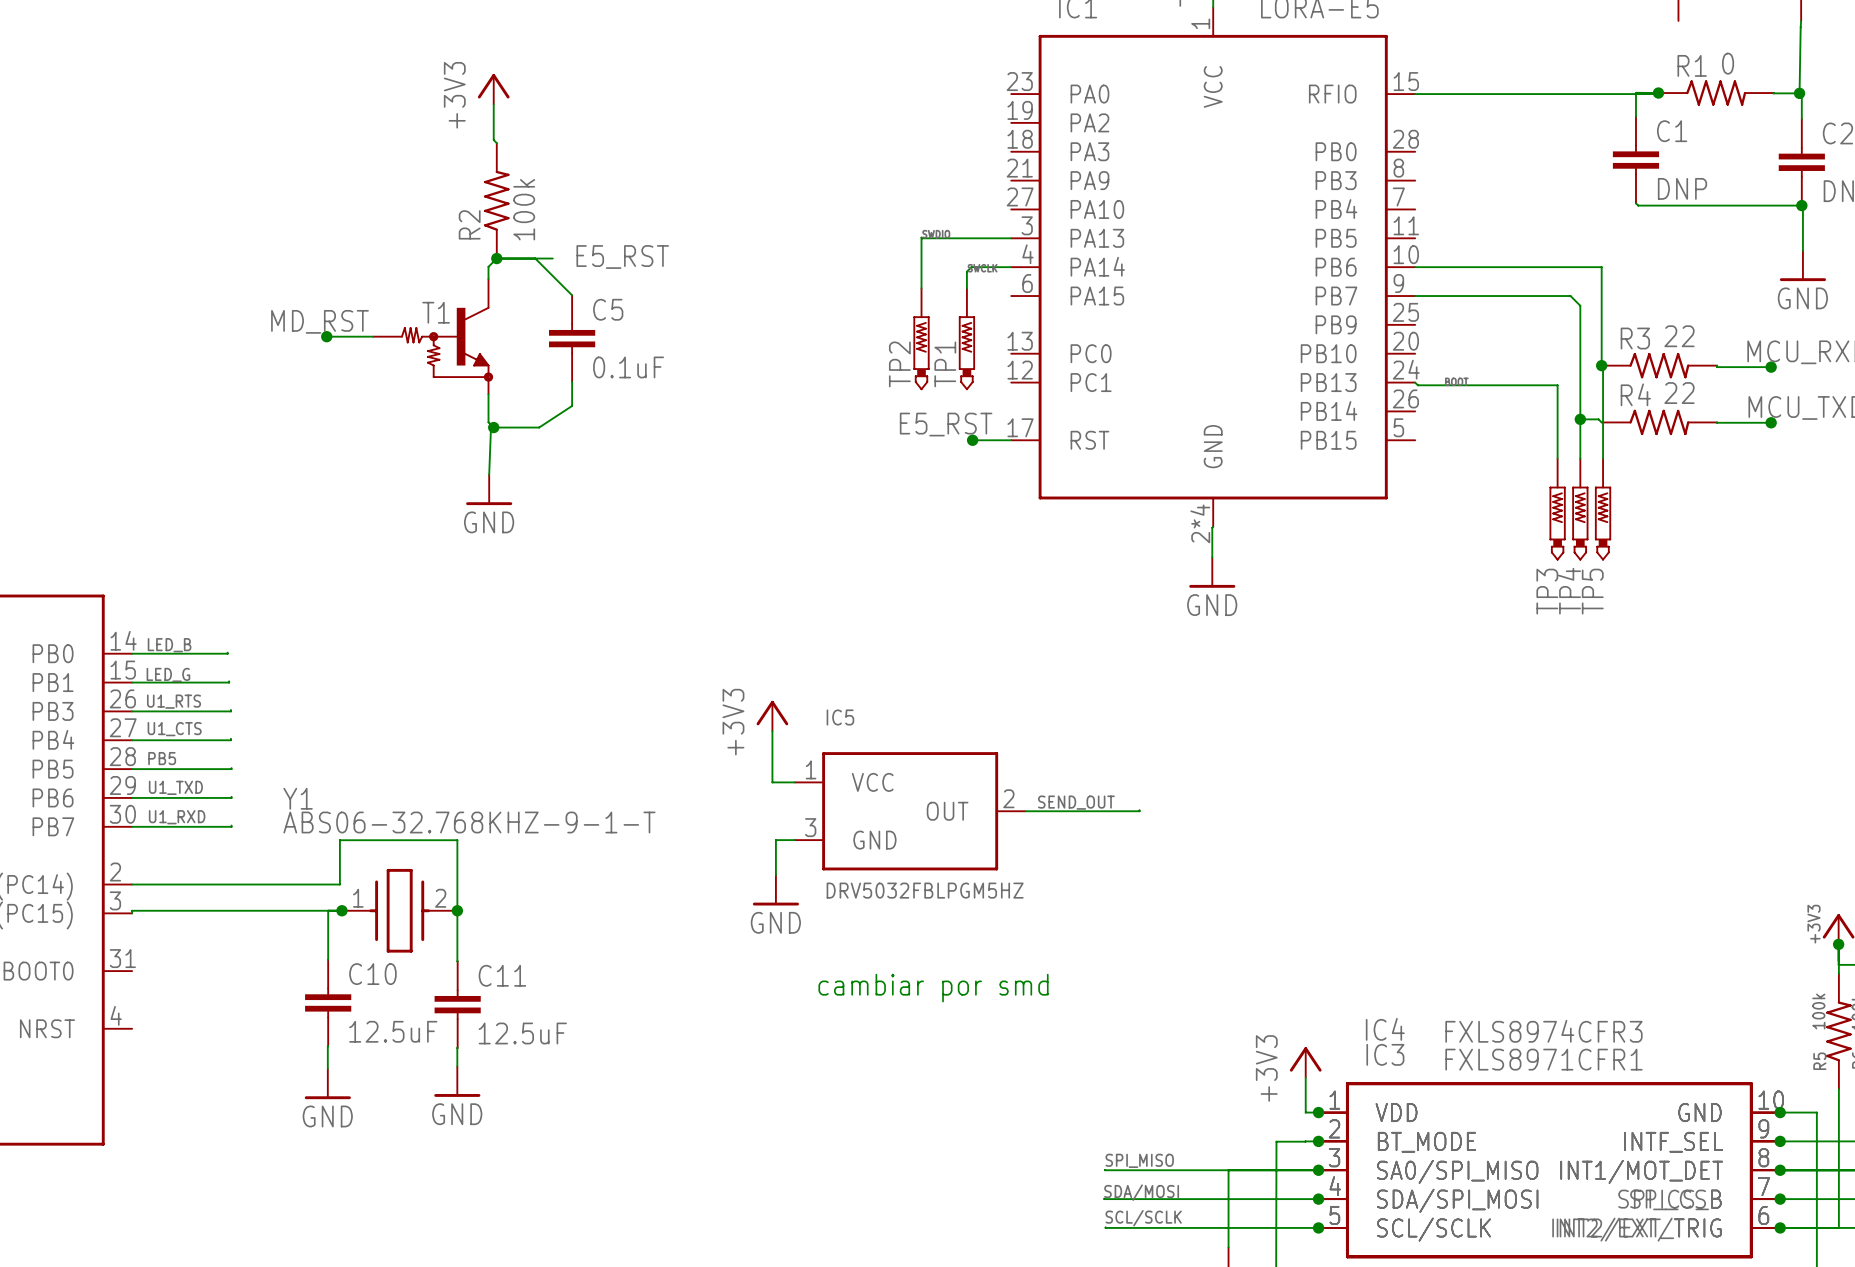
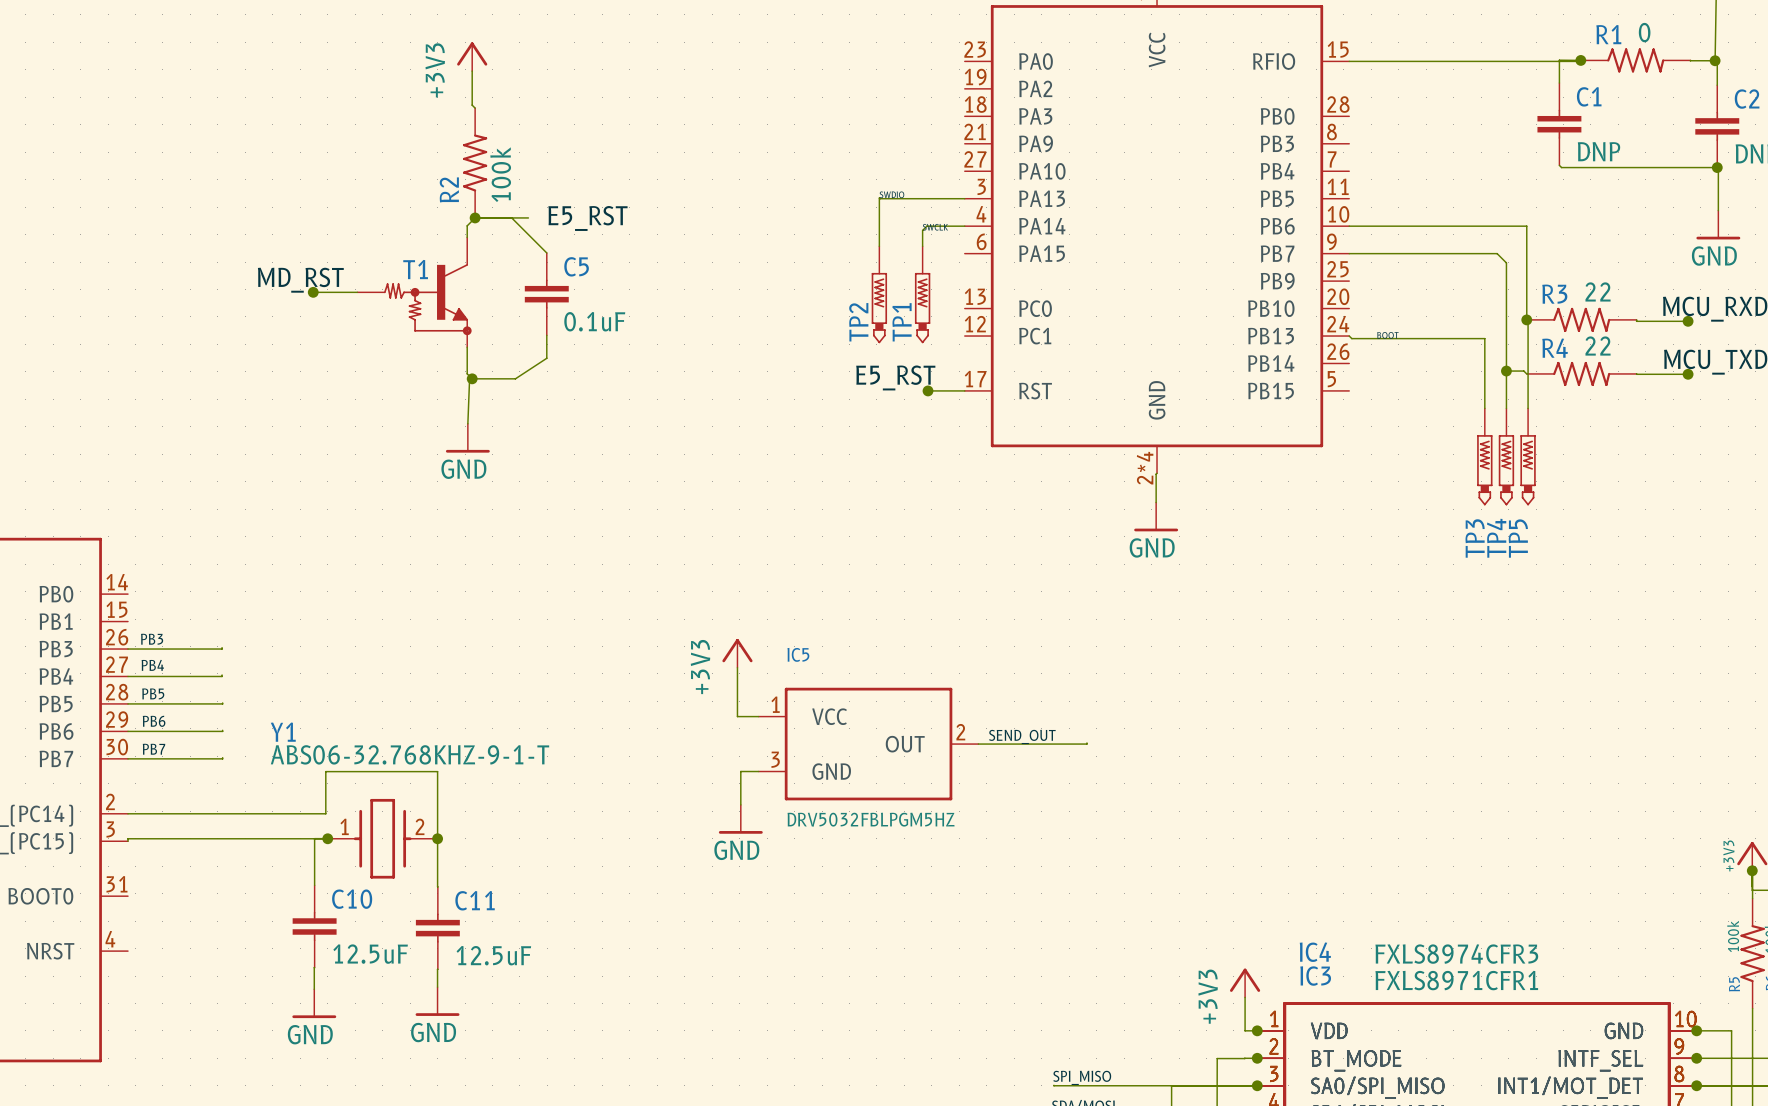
label: LED_B (169, 645) -> none
wire: (227, 652) (132, 653) -> none
label: LED_G (168, 674) -> none
wire: (229, 681) (132, 682) -> none
label: U1_RTS (174, 701) -> PB3 (152, 639)
label: U1_CTS (174, 729) -> PB4 (152, 665)
label: U1_TXD (175, 787) -> PB6 (154, 721)
label: U1_RXD (177, 817) -> PB7 (154, 749)
text: cambiar por smd (933, 988) -> none

